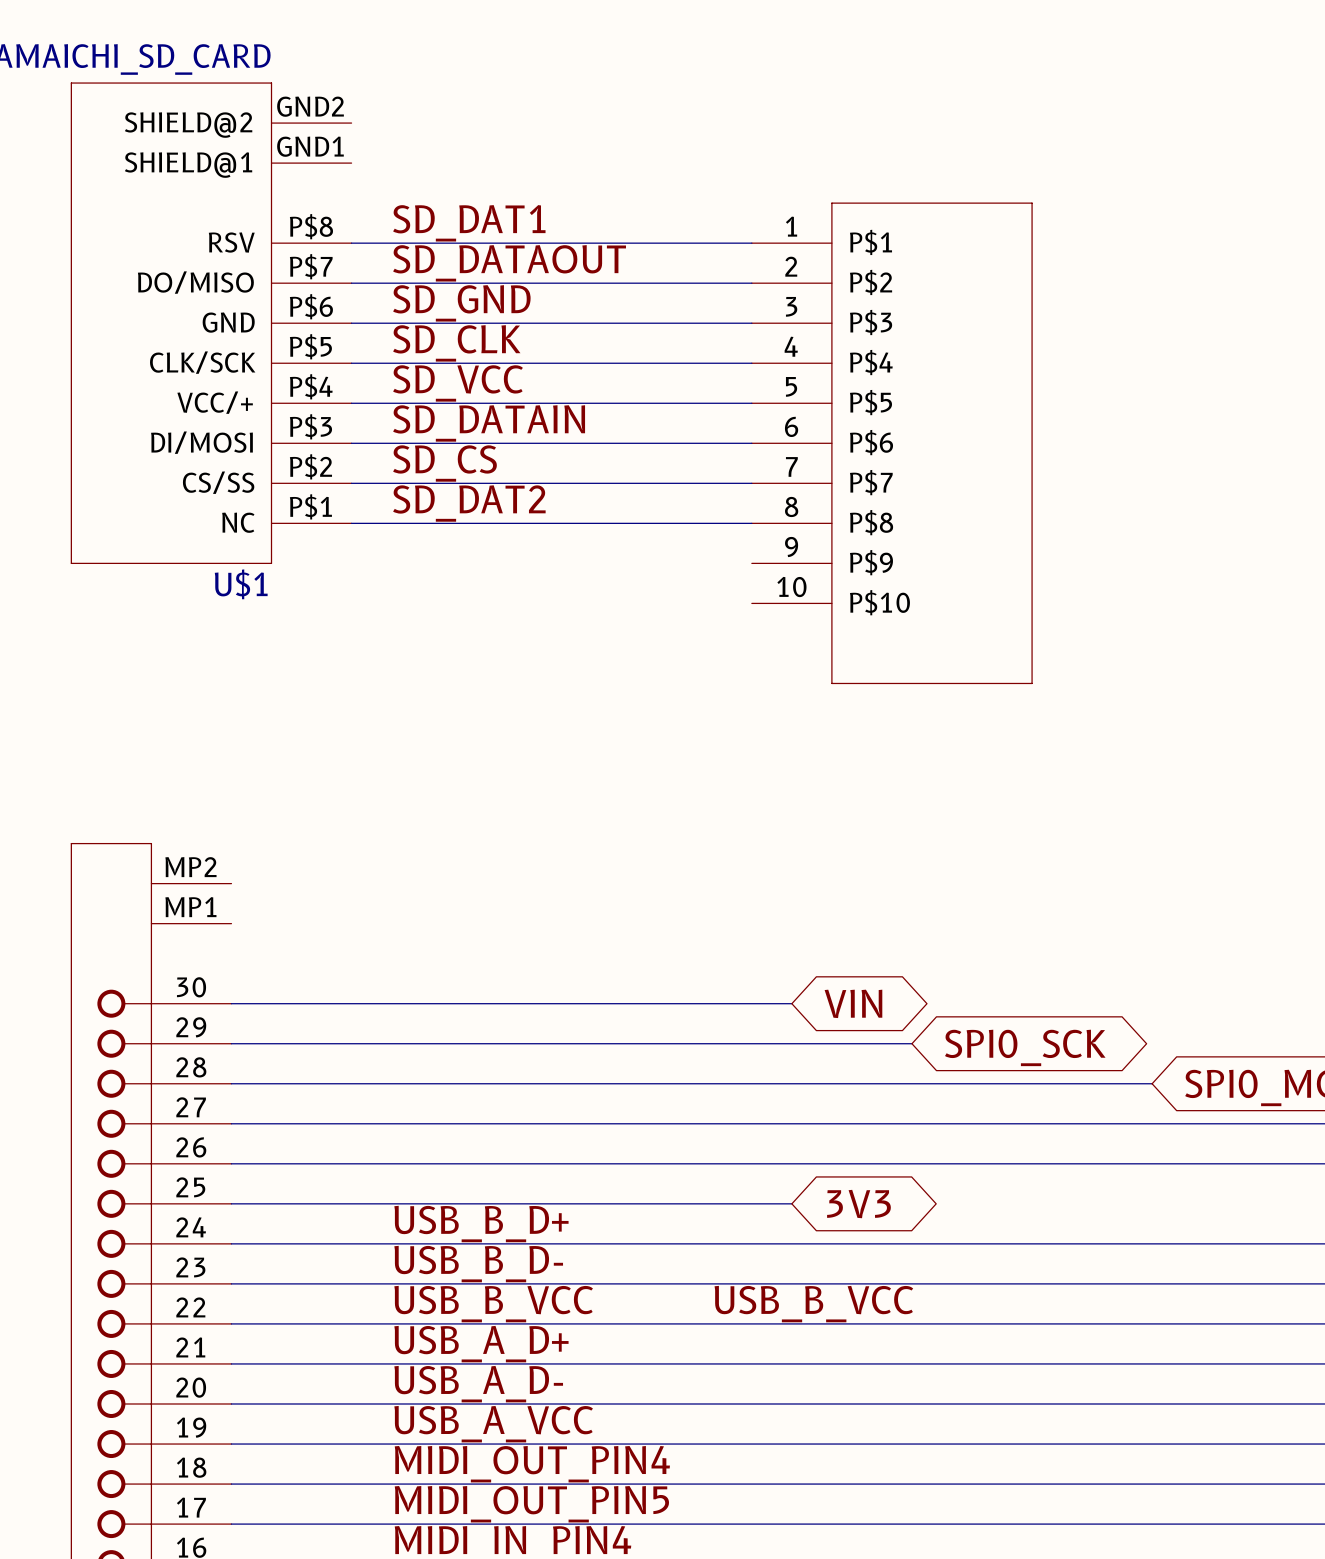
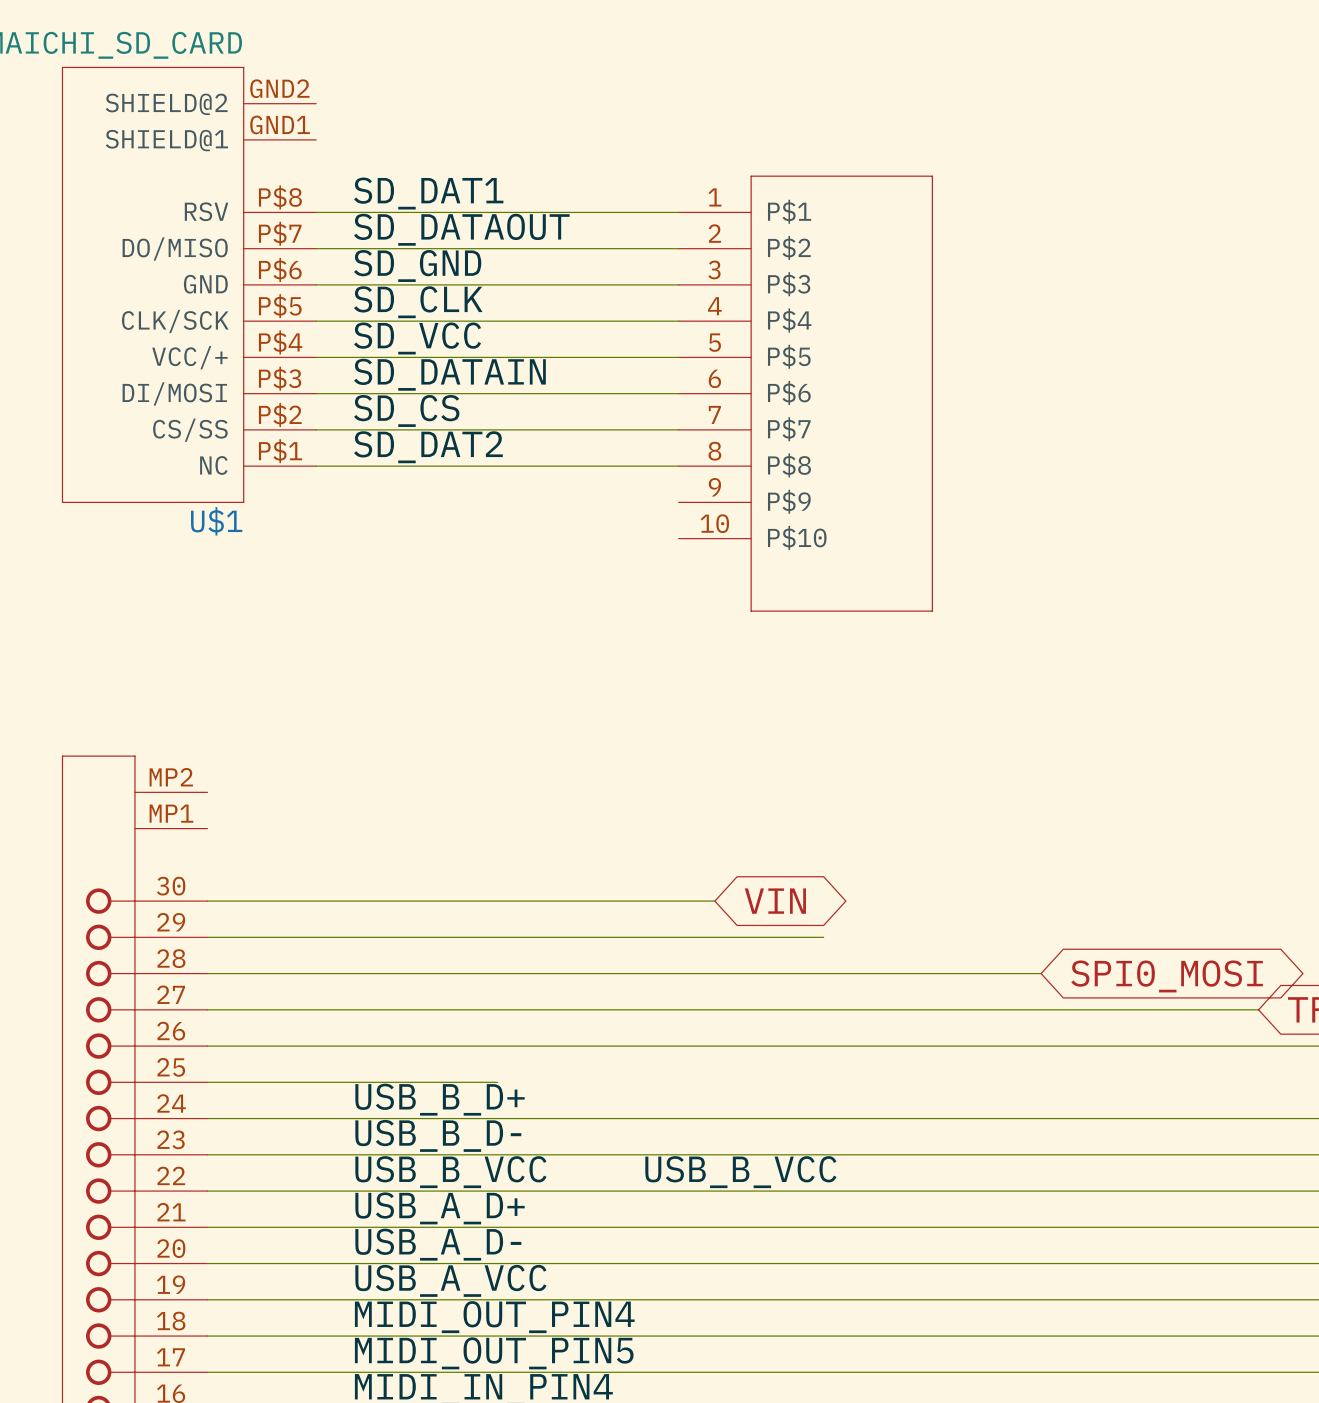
global label: SPI0_SCK (1025, 1047) -> none
wire: (551, 1203) (791, 1203) -> none
global label: 3V3 (858, 1204) -> none

